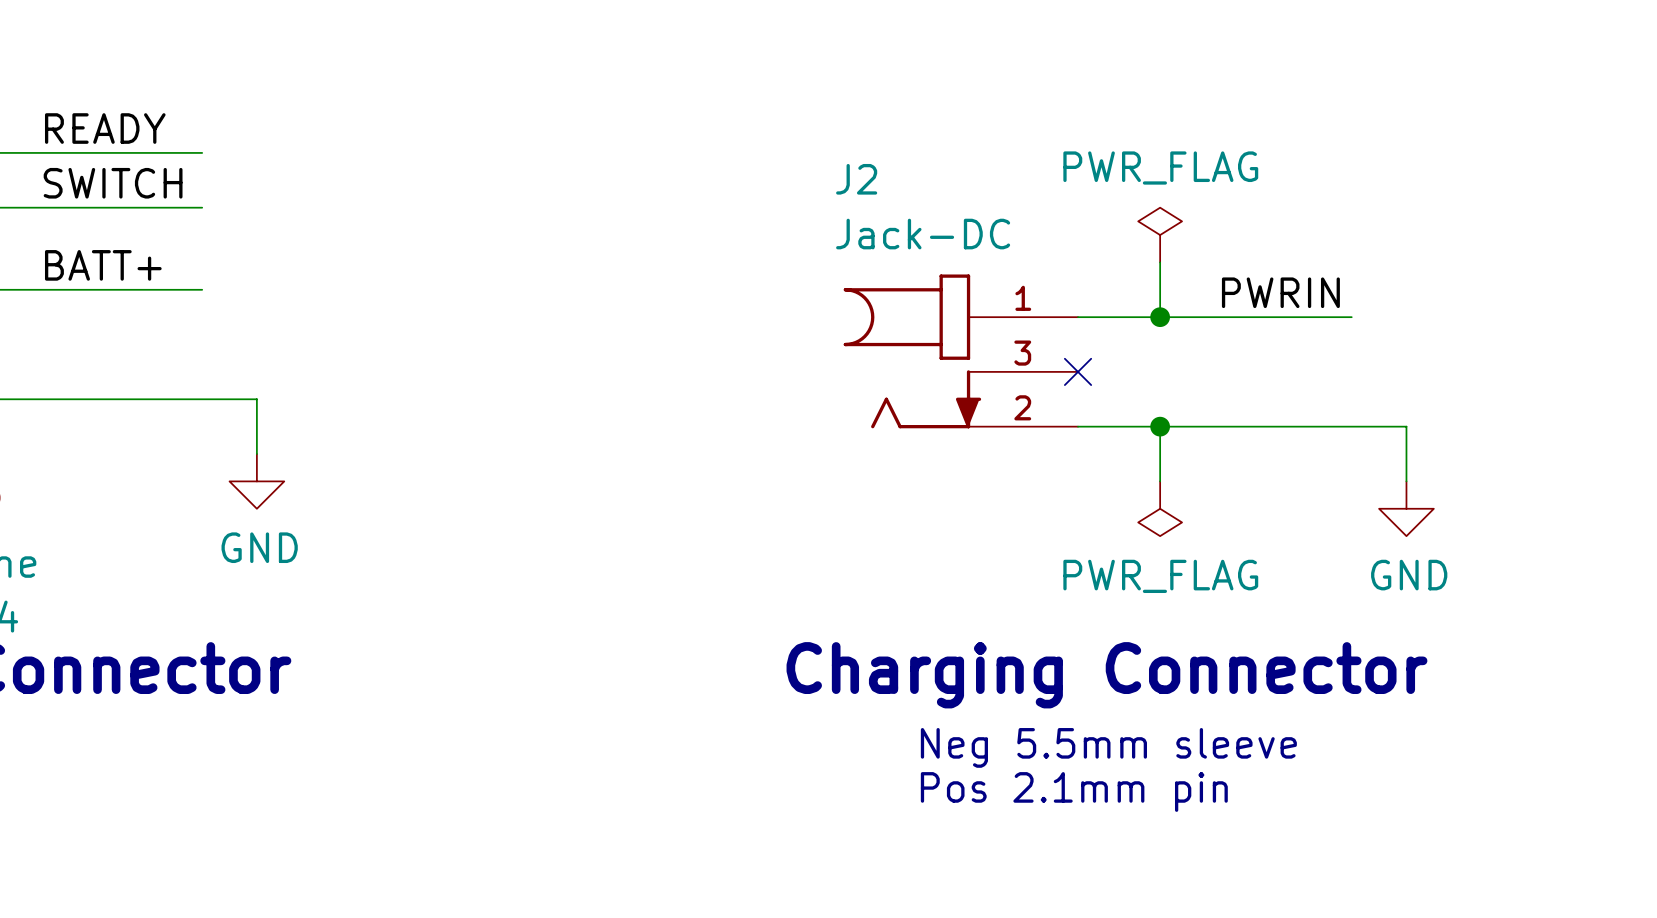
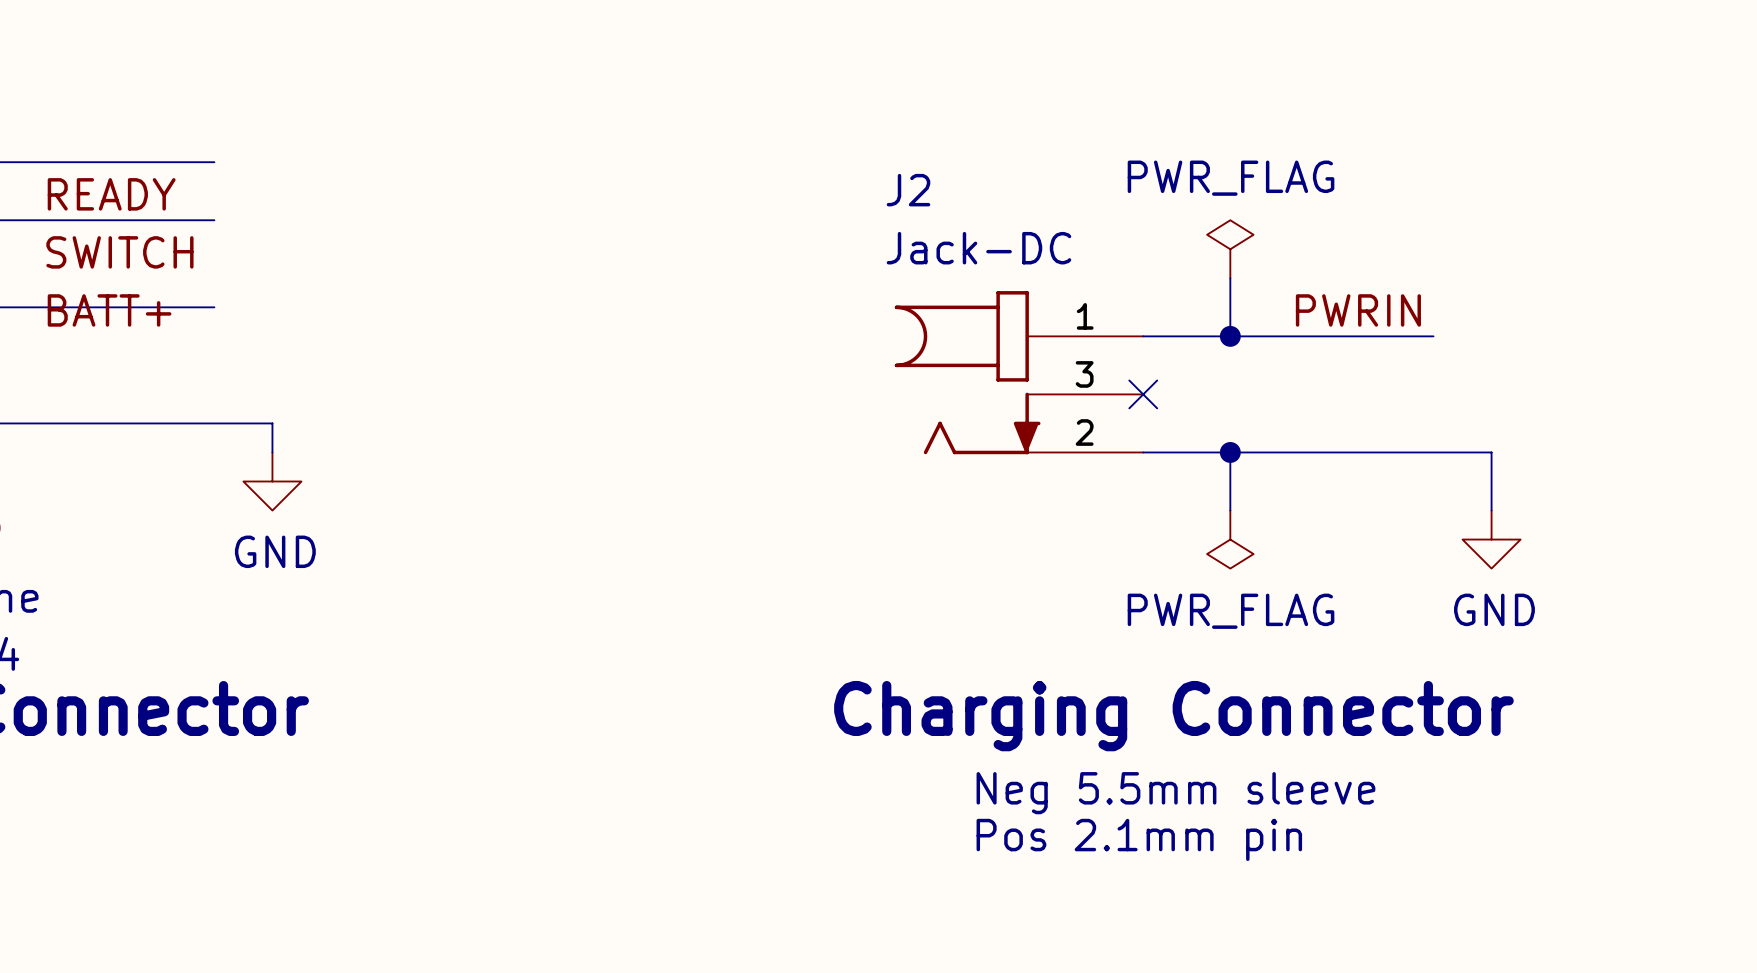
label: READY (105, 128) -> none
label: SWITCH (113, 183) -> READY (111, 194)
label: none -> SWITCH (119, 252)
label position: BATT+ (103, 265) -> BATT+ (109, 310)
power symbol position: GND (256, 481) -> GND (272, 481)

